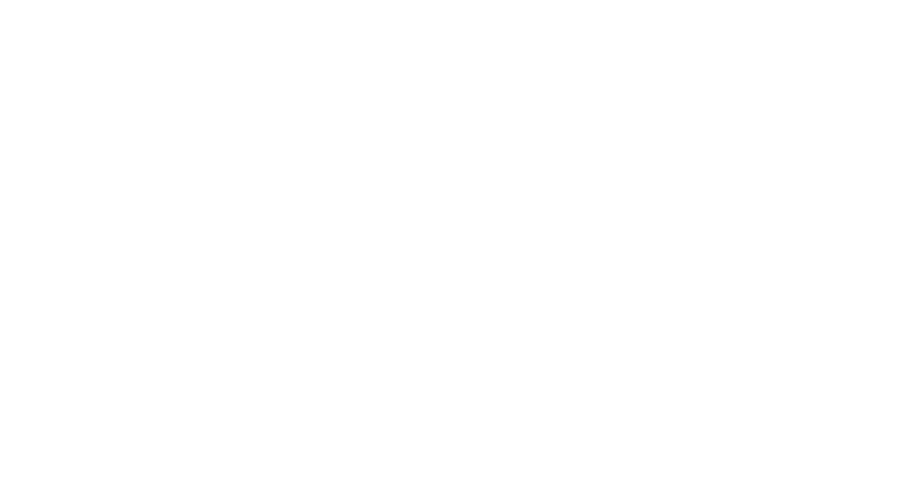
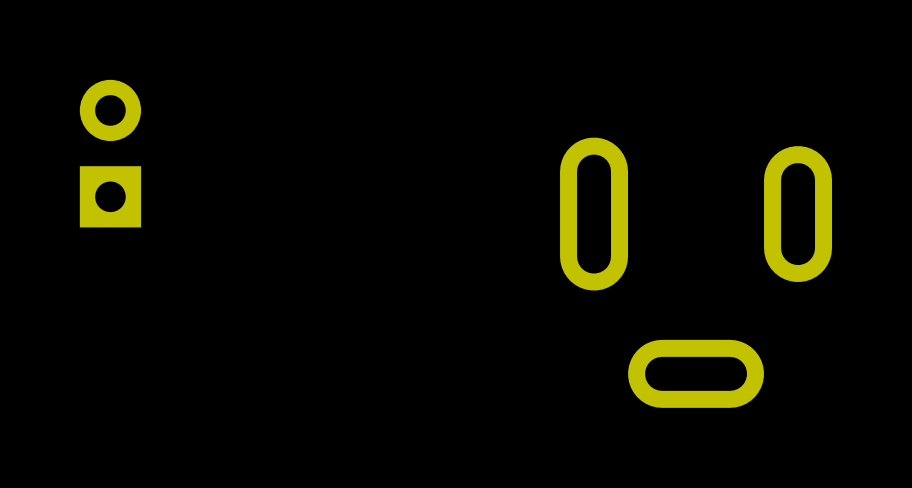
part: none -> (110, 153)
part: none -> (696, 272)

